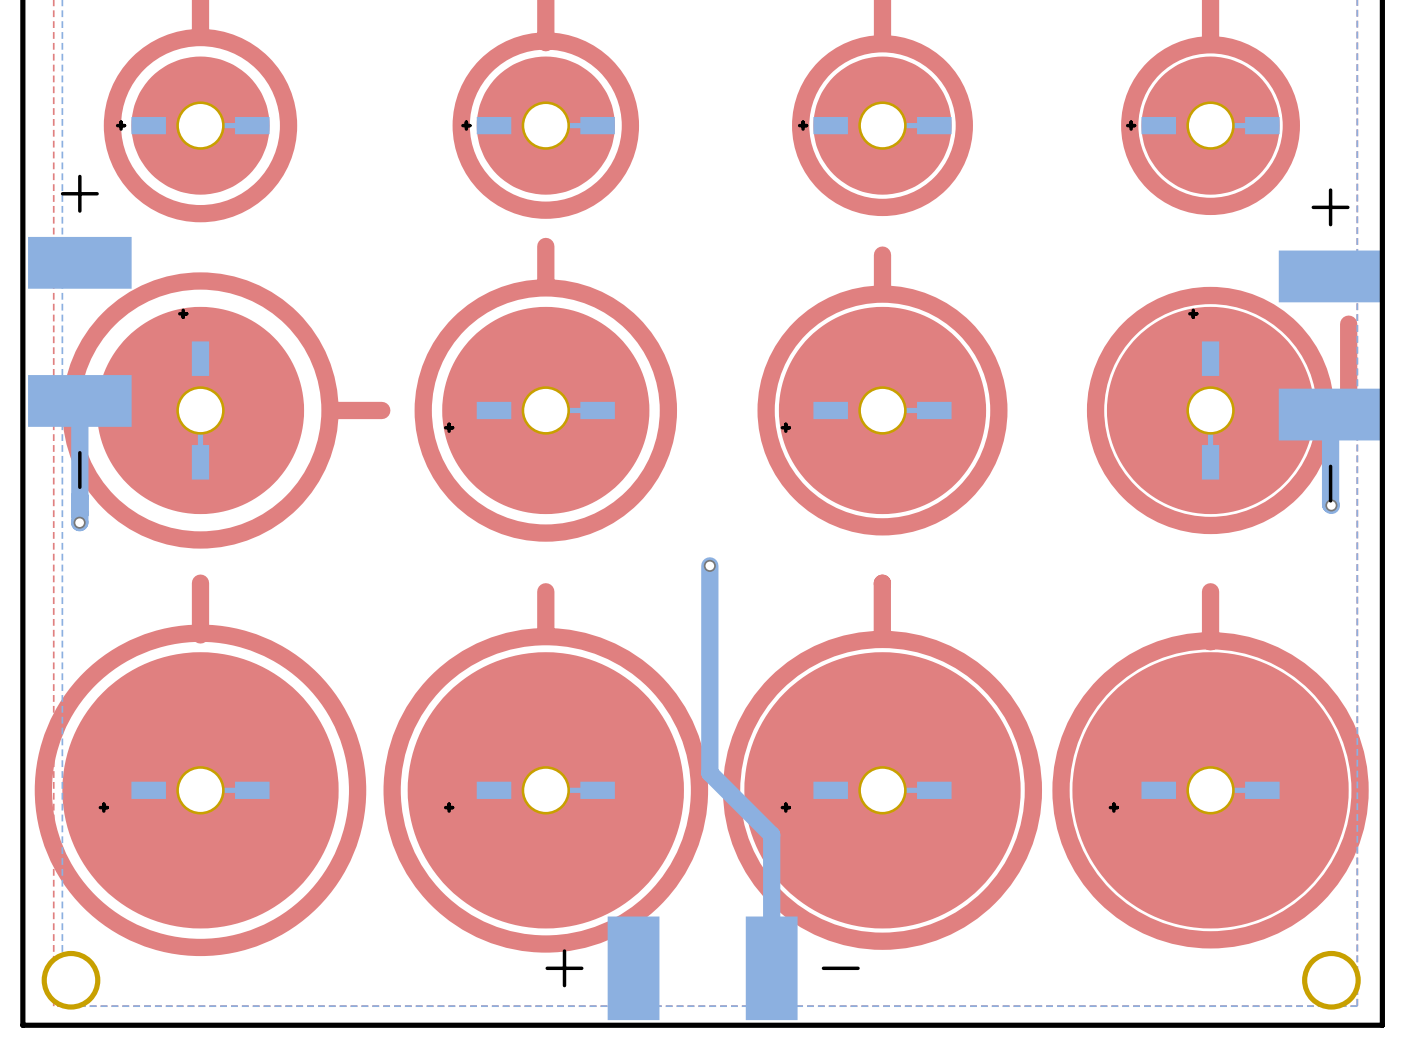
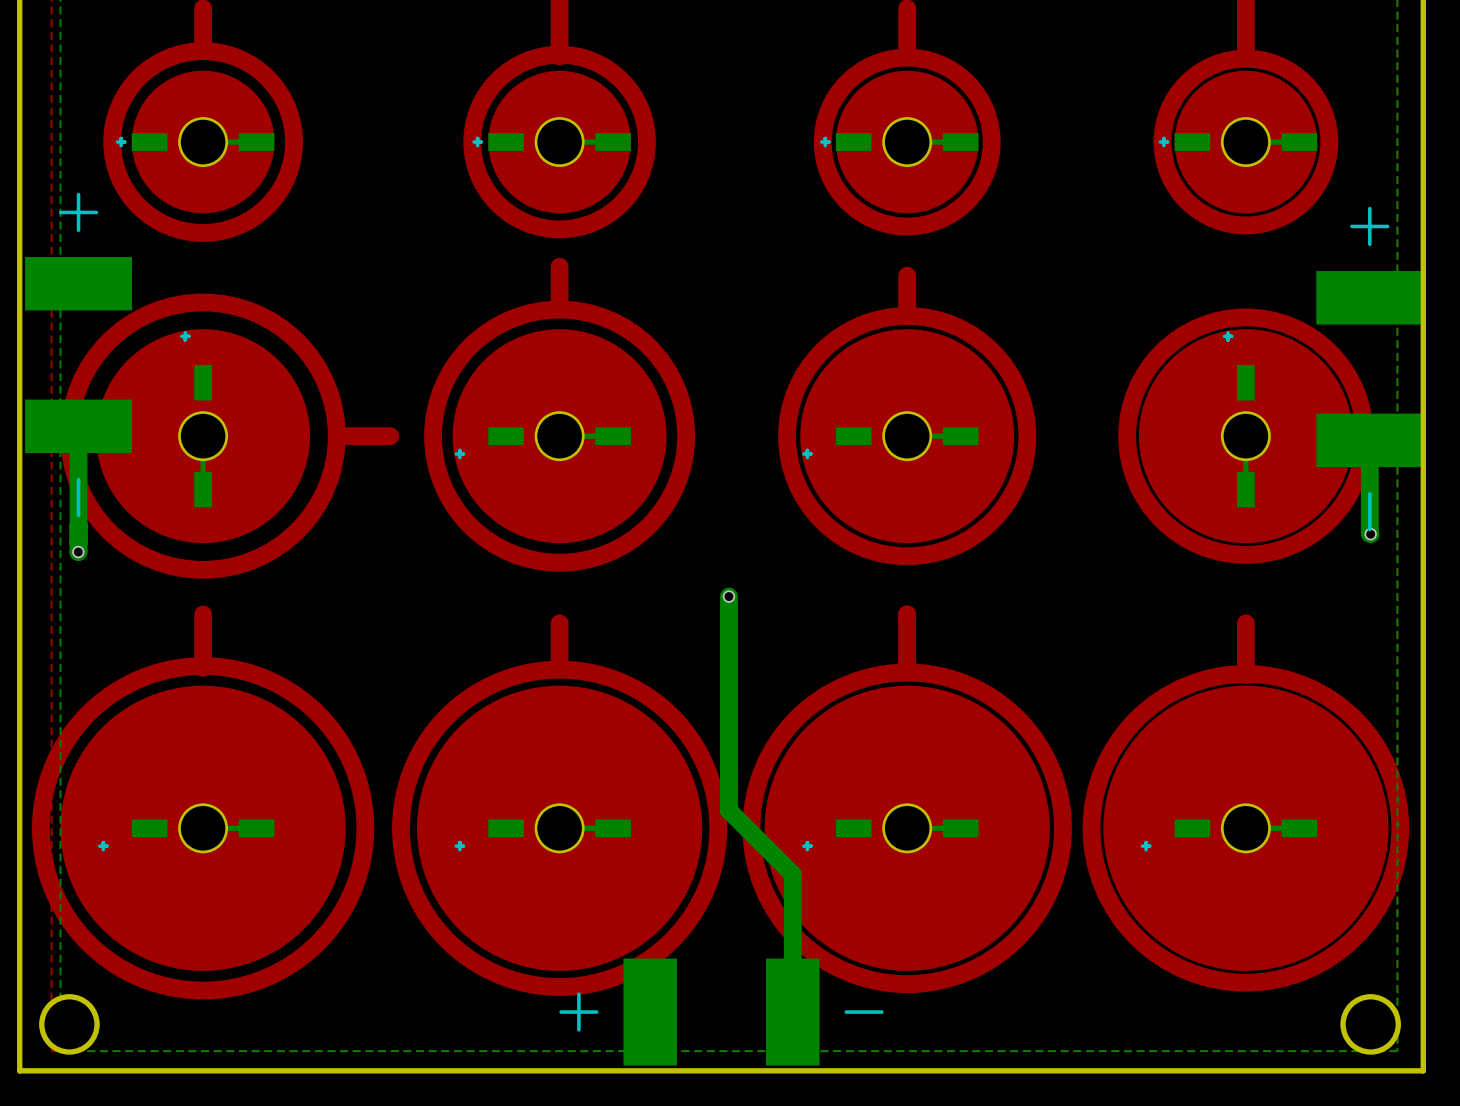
top track: (1348, 324) (1348, 410) -> none

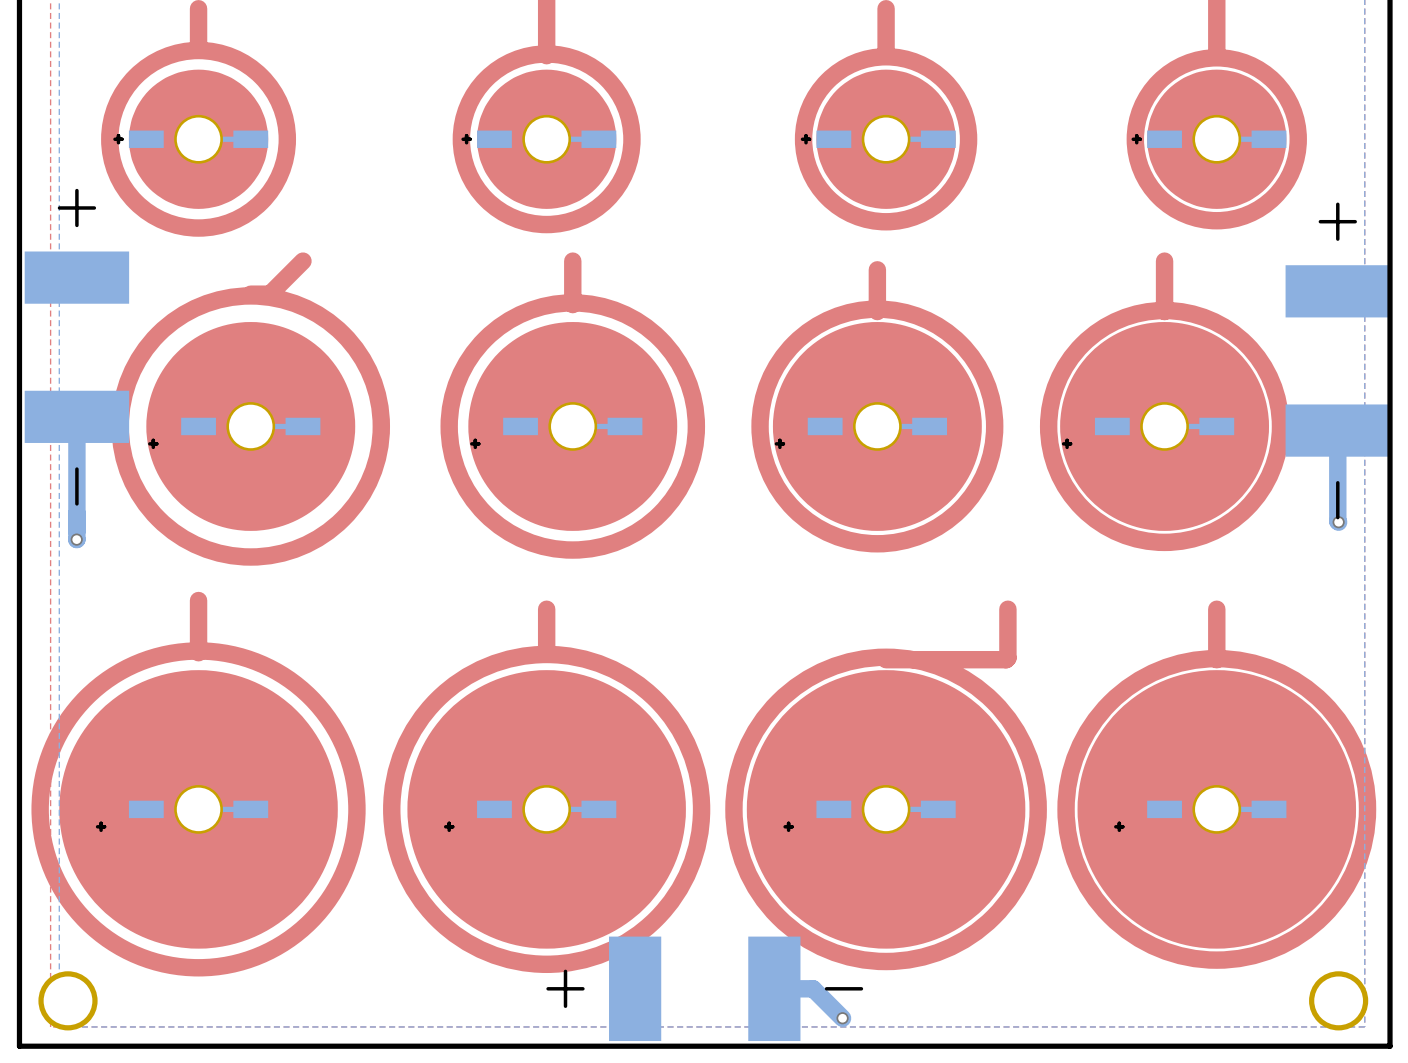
top track: none -> (302, 261) (269, 294) (250, 294)
top track: (559, 266) (559, 307) -> none
top track: none -> (572, 261) (572, 304)
top track: none -> (1164, 261) (1164, 311)
top track: none -> (877, 269) (877, 311)
top track: (907, 275) (907, 313) -> none
part footprint: [778, 307, 1037, 566] -> [751, 300, 1004, 553]
part rotation: 0° (203, 436) -> 90° counterclockwise (250, 426)
top track: (390, 436) (338, 436) -> none
part: (559, 436) -> none
part: none -> (572, 426)
part rotation: 0° (1245, 436) -> 90° counterclockwise (1164, 426)
bottom track: (728, 596) (728, 810) (792, 874) (792, 1012) -> (842, 1018) (813, 988) (774, 988)
via: (728, 596) -> none
top track: (907, 614) (907, 669) -> none
top track: none -> (1007, 609) (1007, 657) (1006, 659) (886, 659)
via: none -> (842, 1018)

